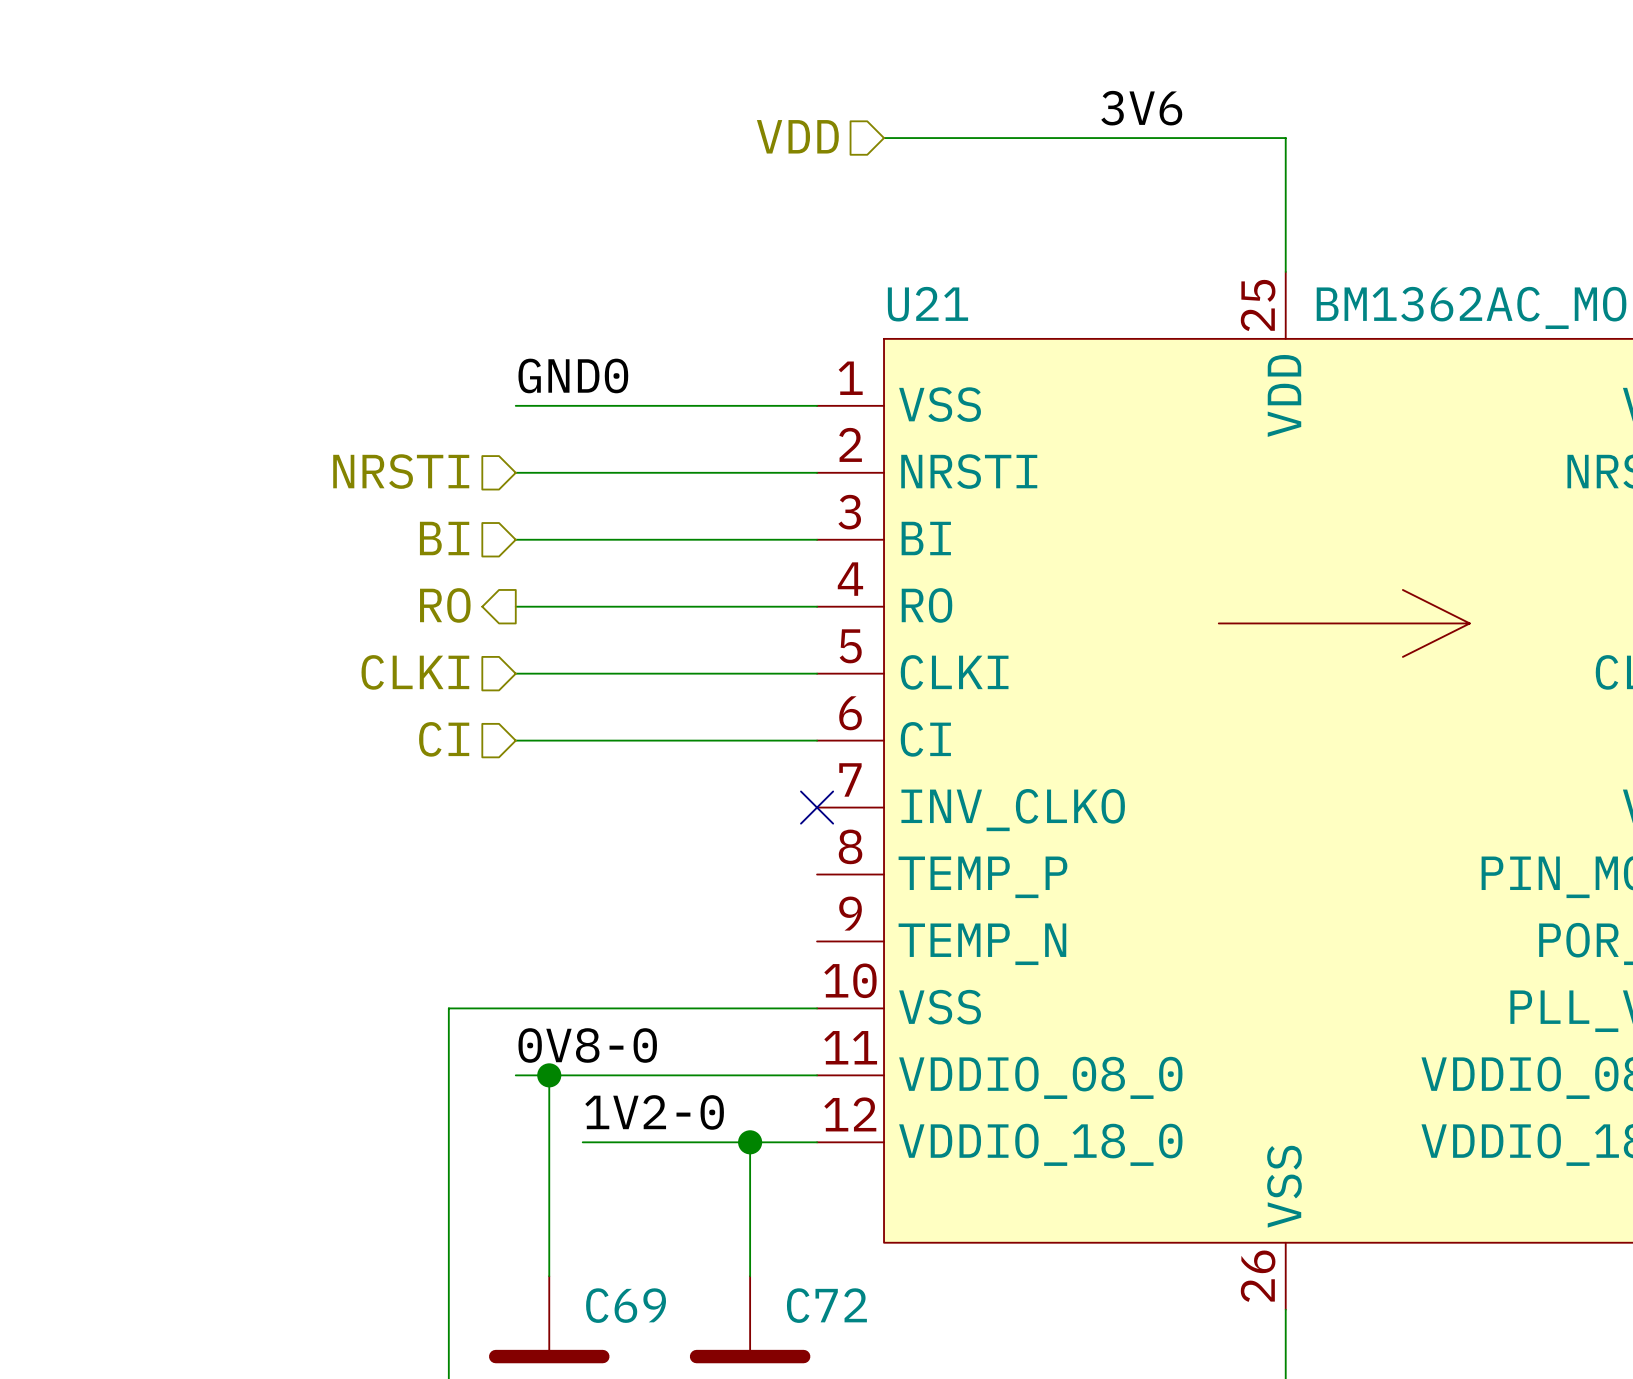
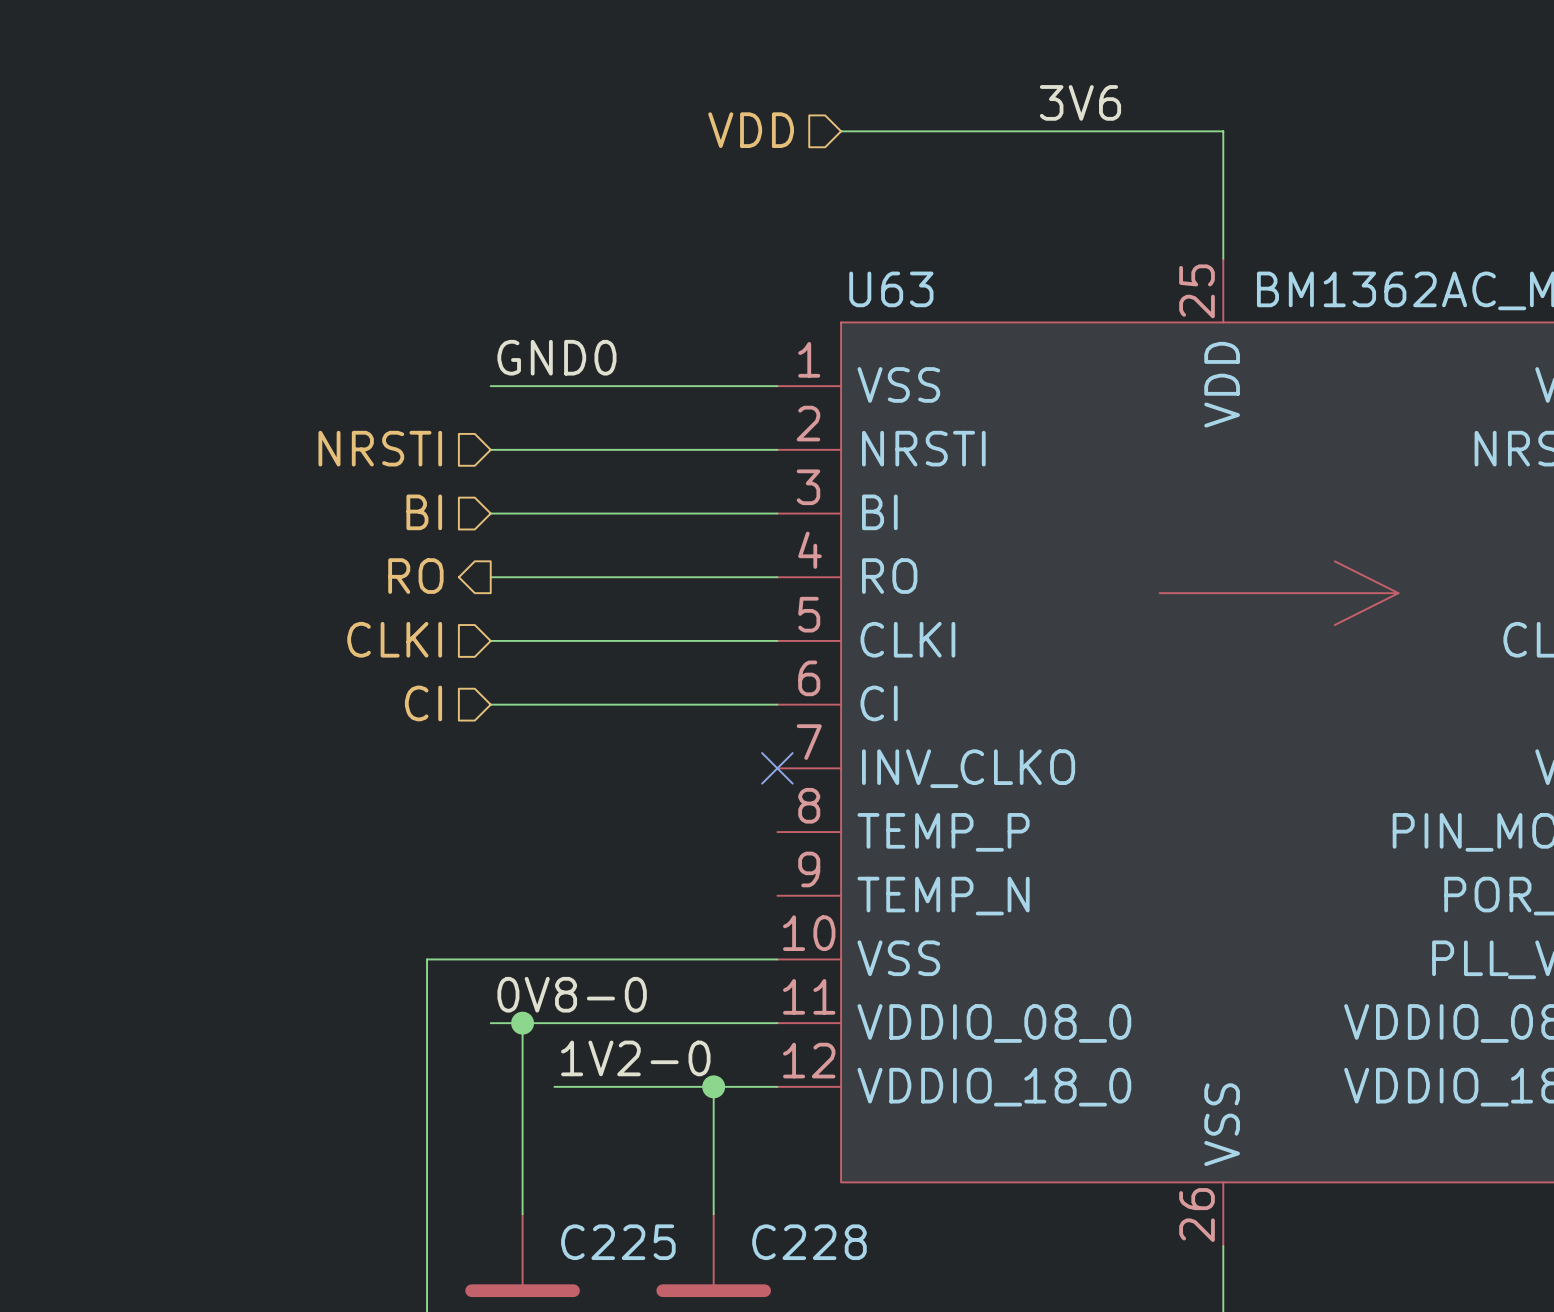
U21 name: U21 (927, 304) -> U63 (891, 289)
C69 name: C69 (626, 1305) -> C225 (618, 1242)
C72 name: C72 (826, 1305) -> C228 (809, 1242)

